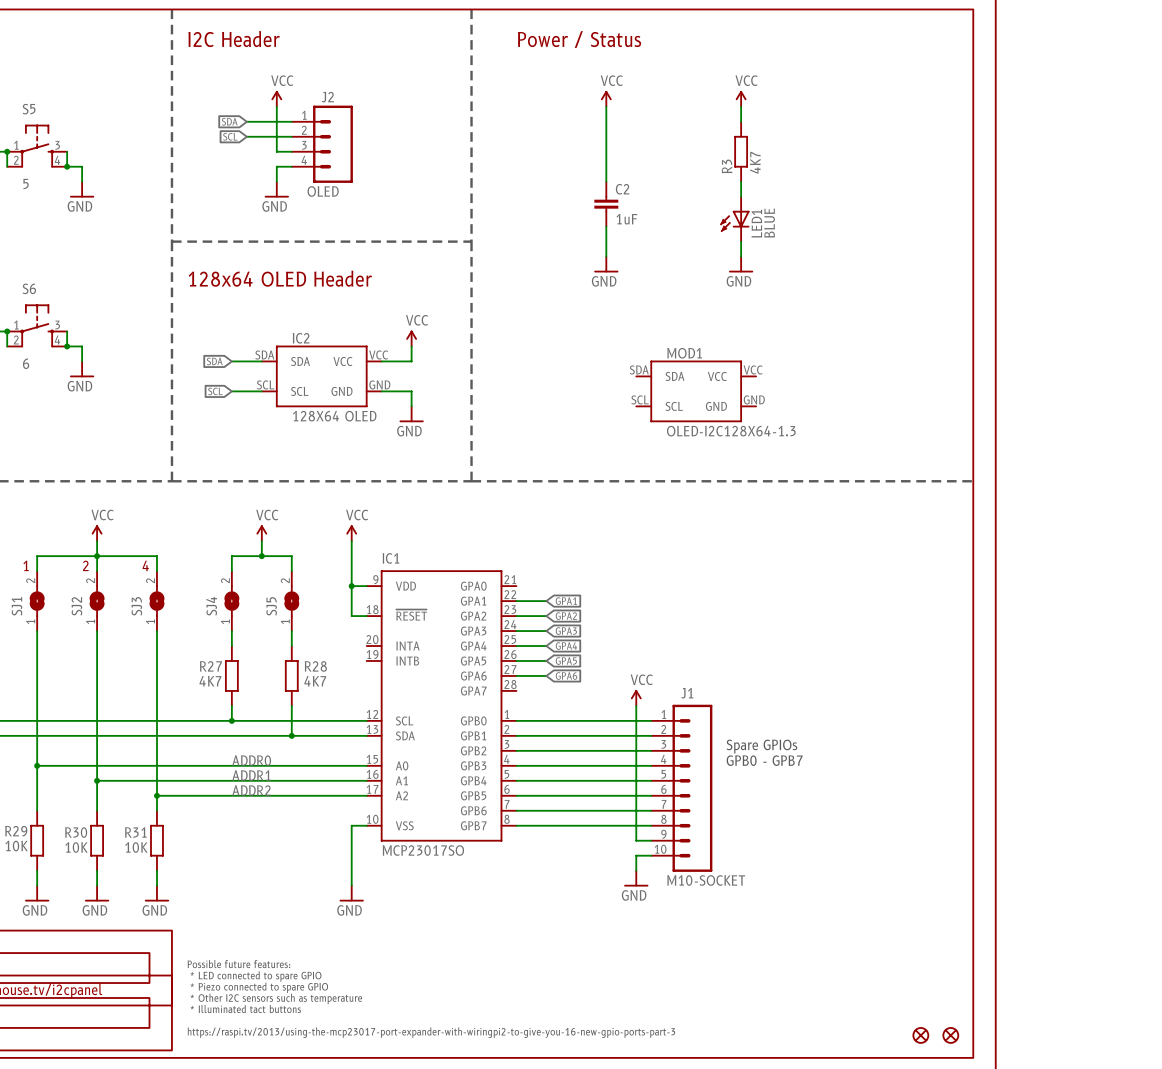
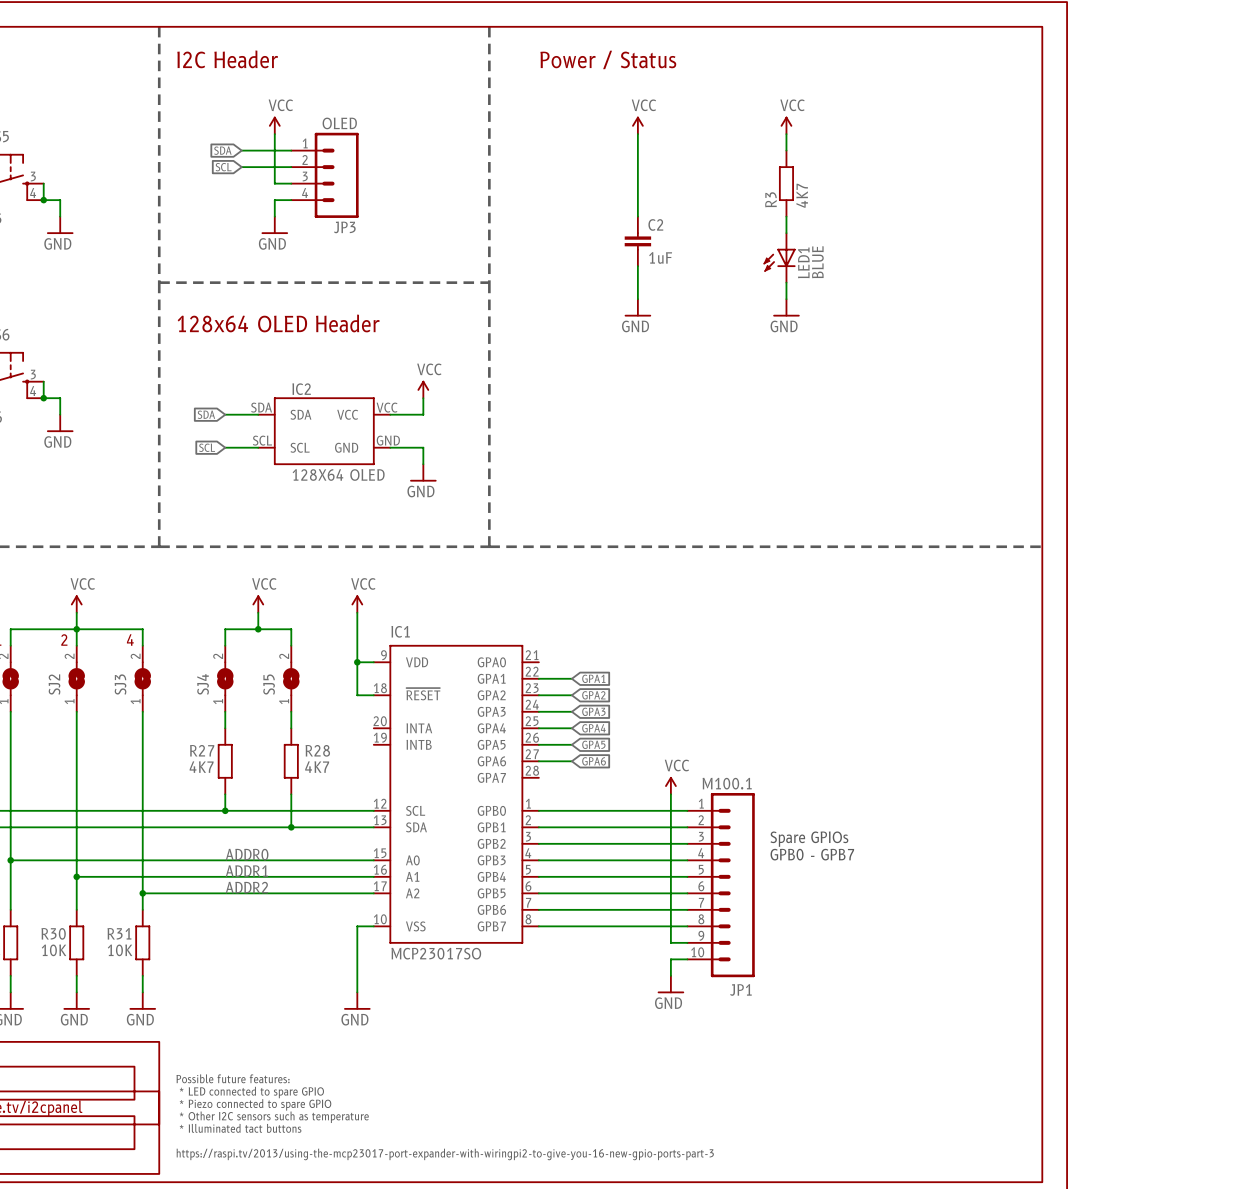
J2 name: J2 (327, 97) -> JP3 (344, 227)
J2 value position: OLED (323, 191) -> OLED (339, 123)
MOD1: OLED-I2C128X64-1.3 (696, 391) -> none
J1 name: J1 (687, 693) -> JP1 (740, 989)
J1 value: M10-SOCKET (706, 880) -> M100.1 (727, 783)
part: (920, 1035) -> none
part: (950, 1035) -> none

